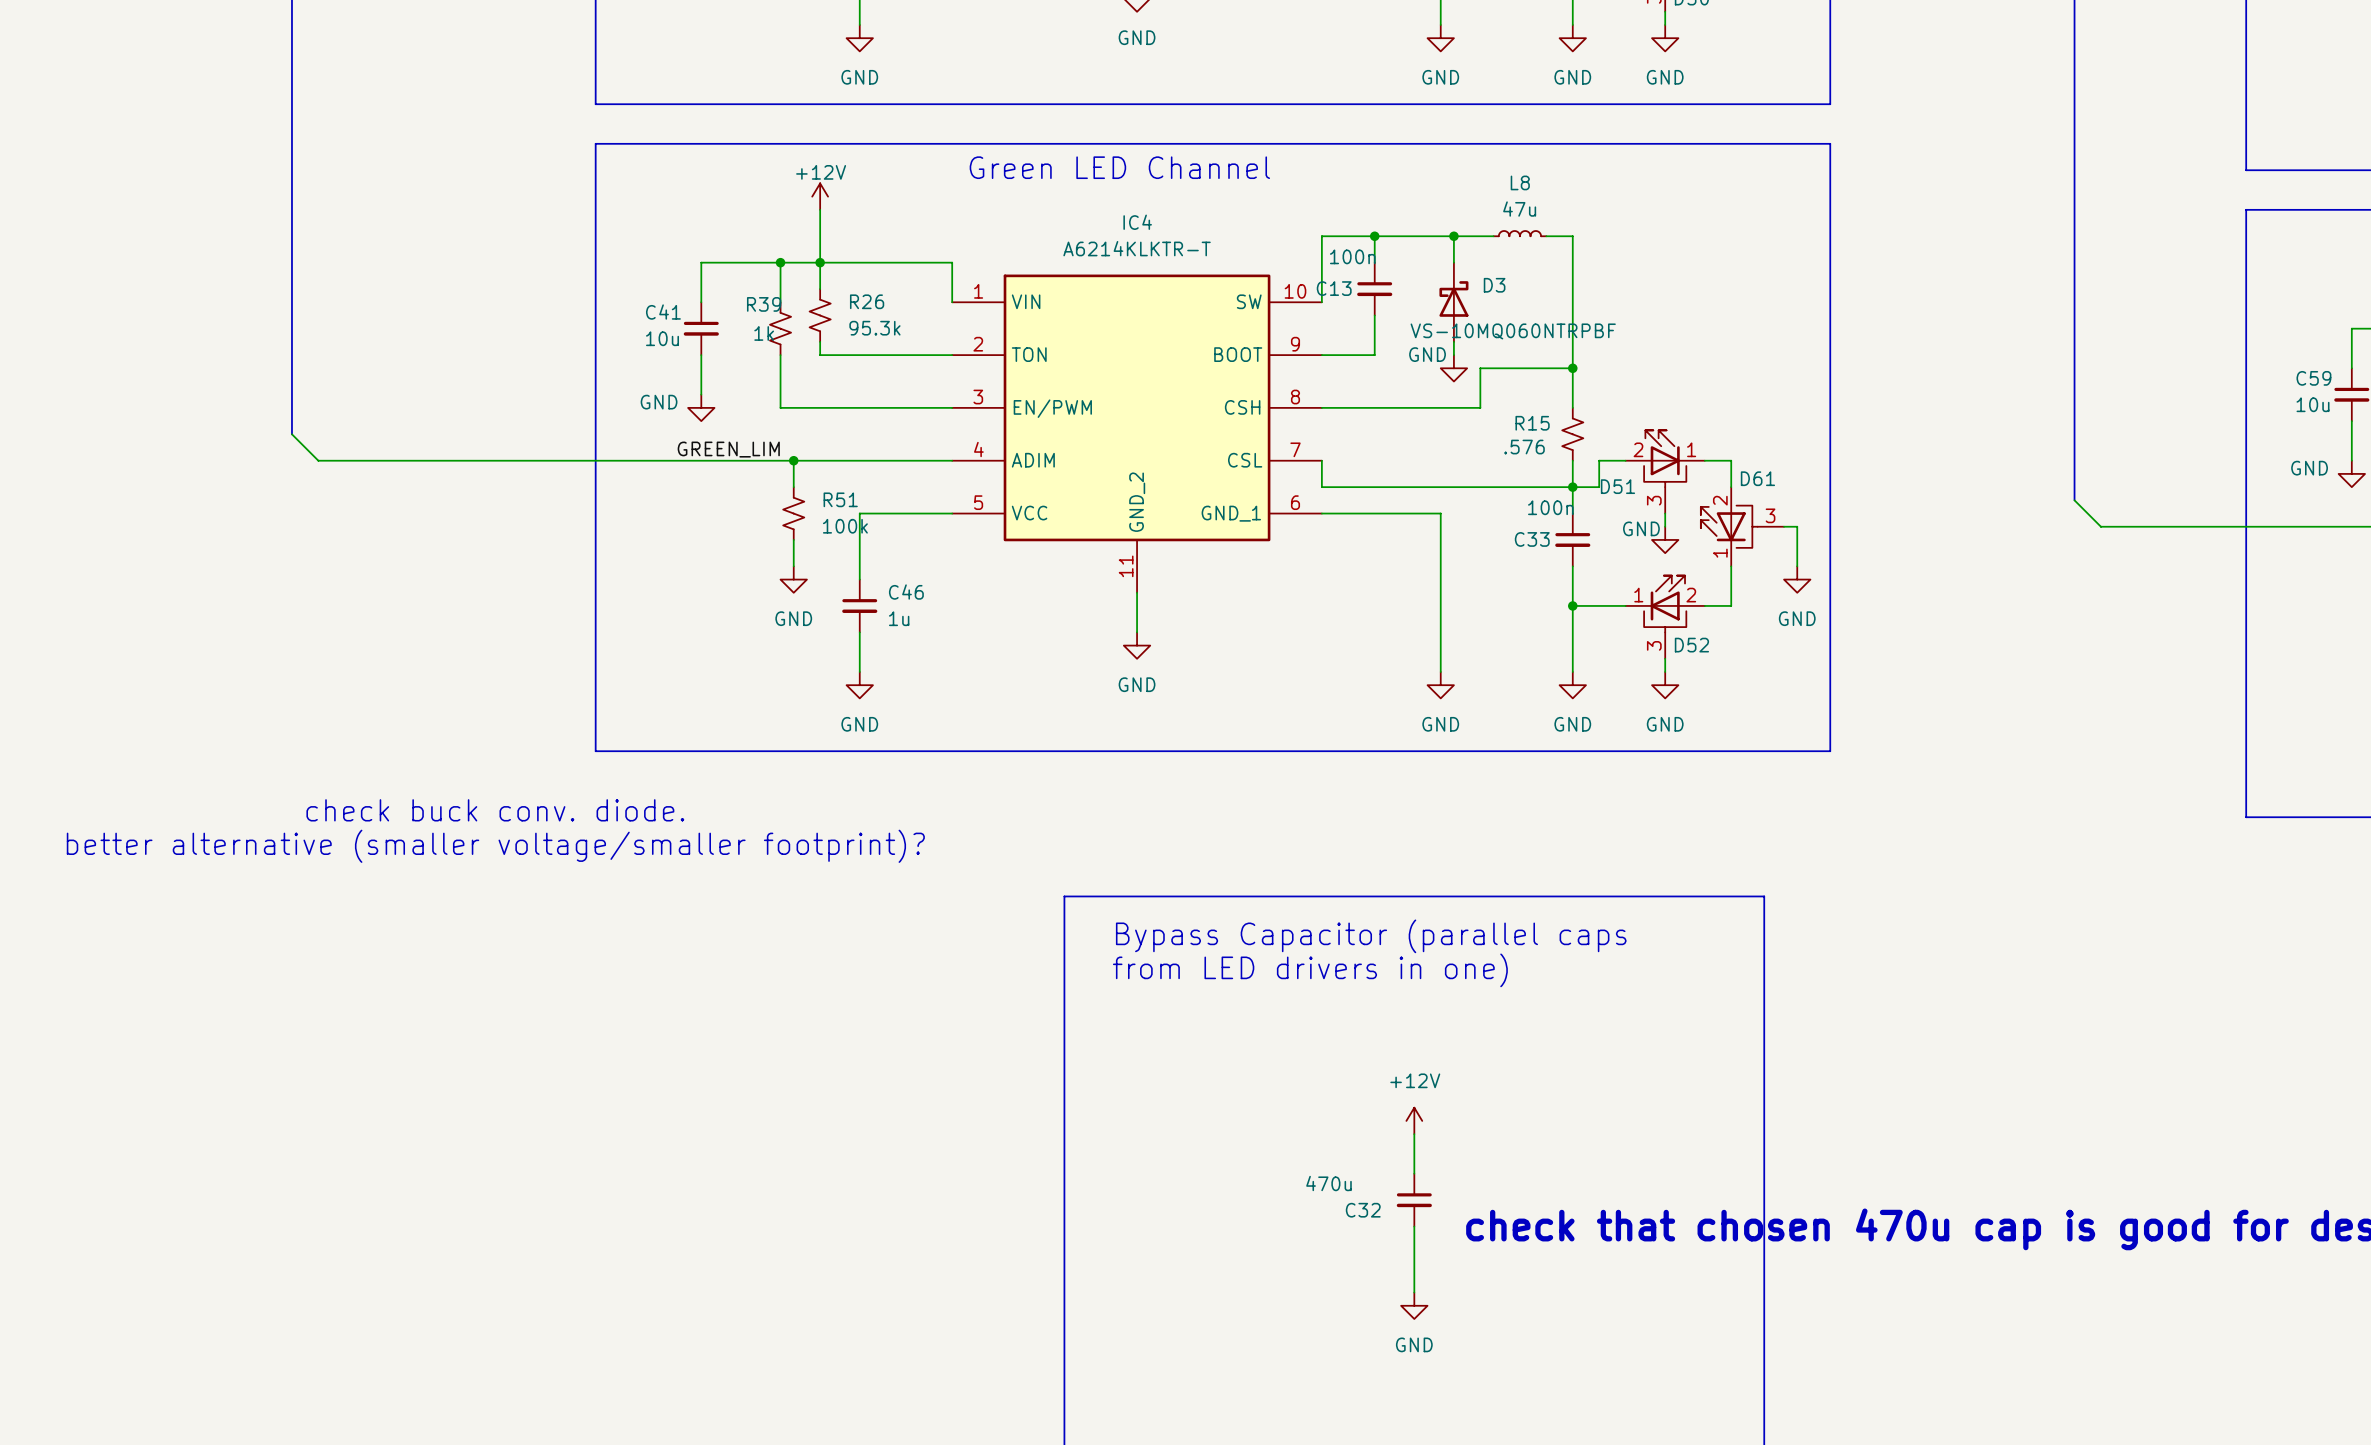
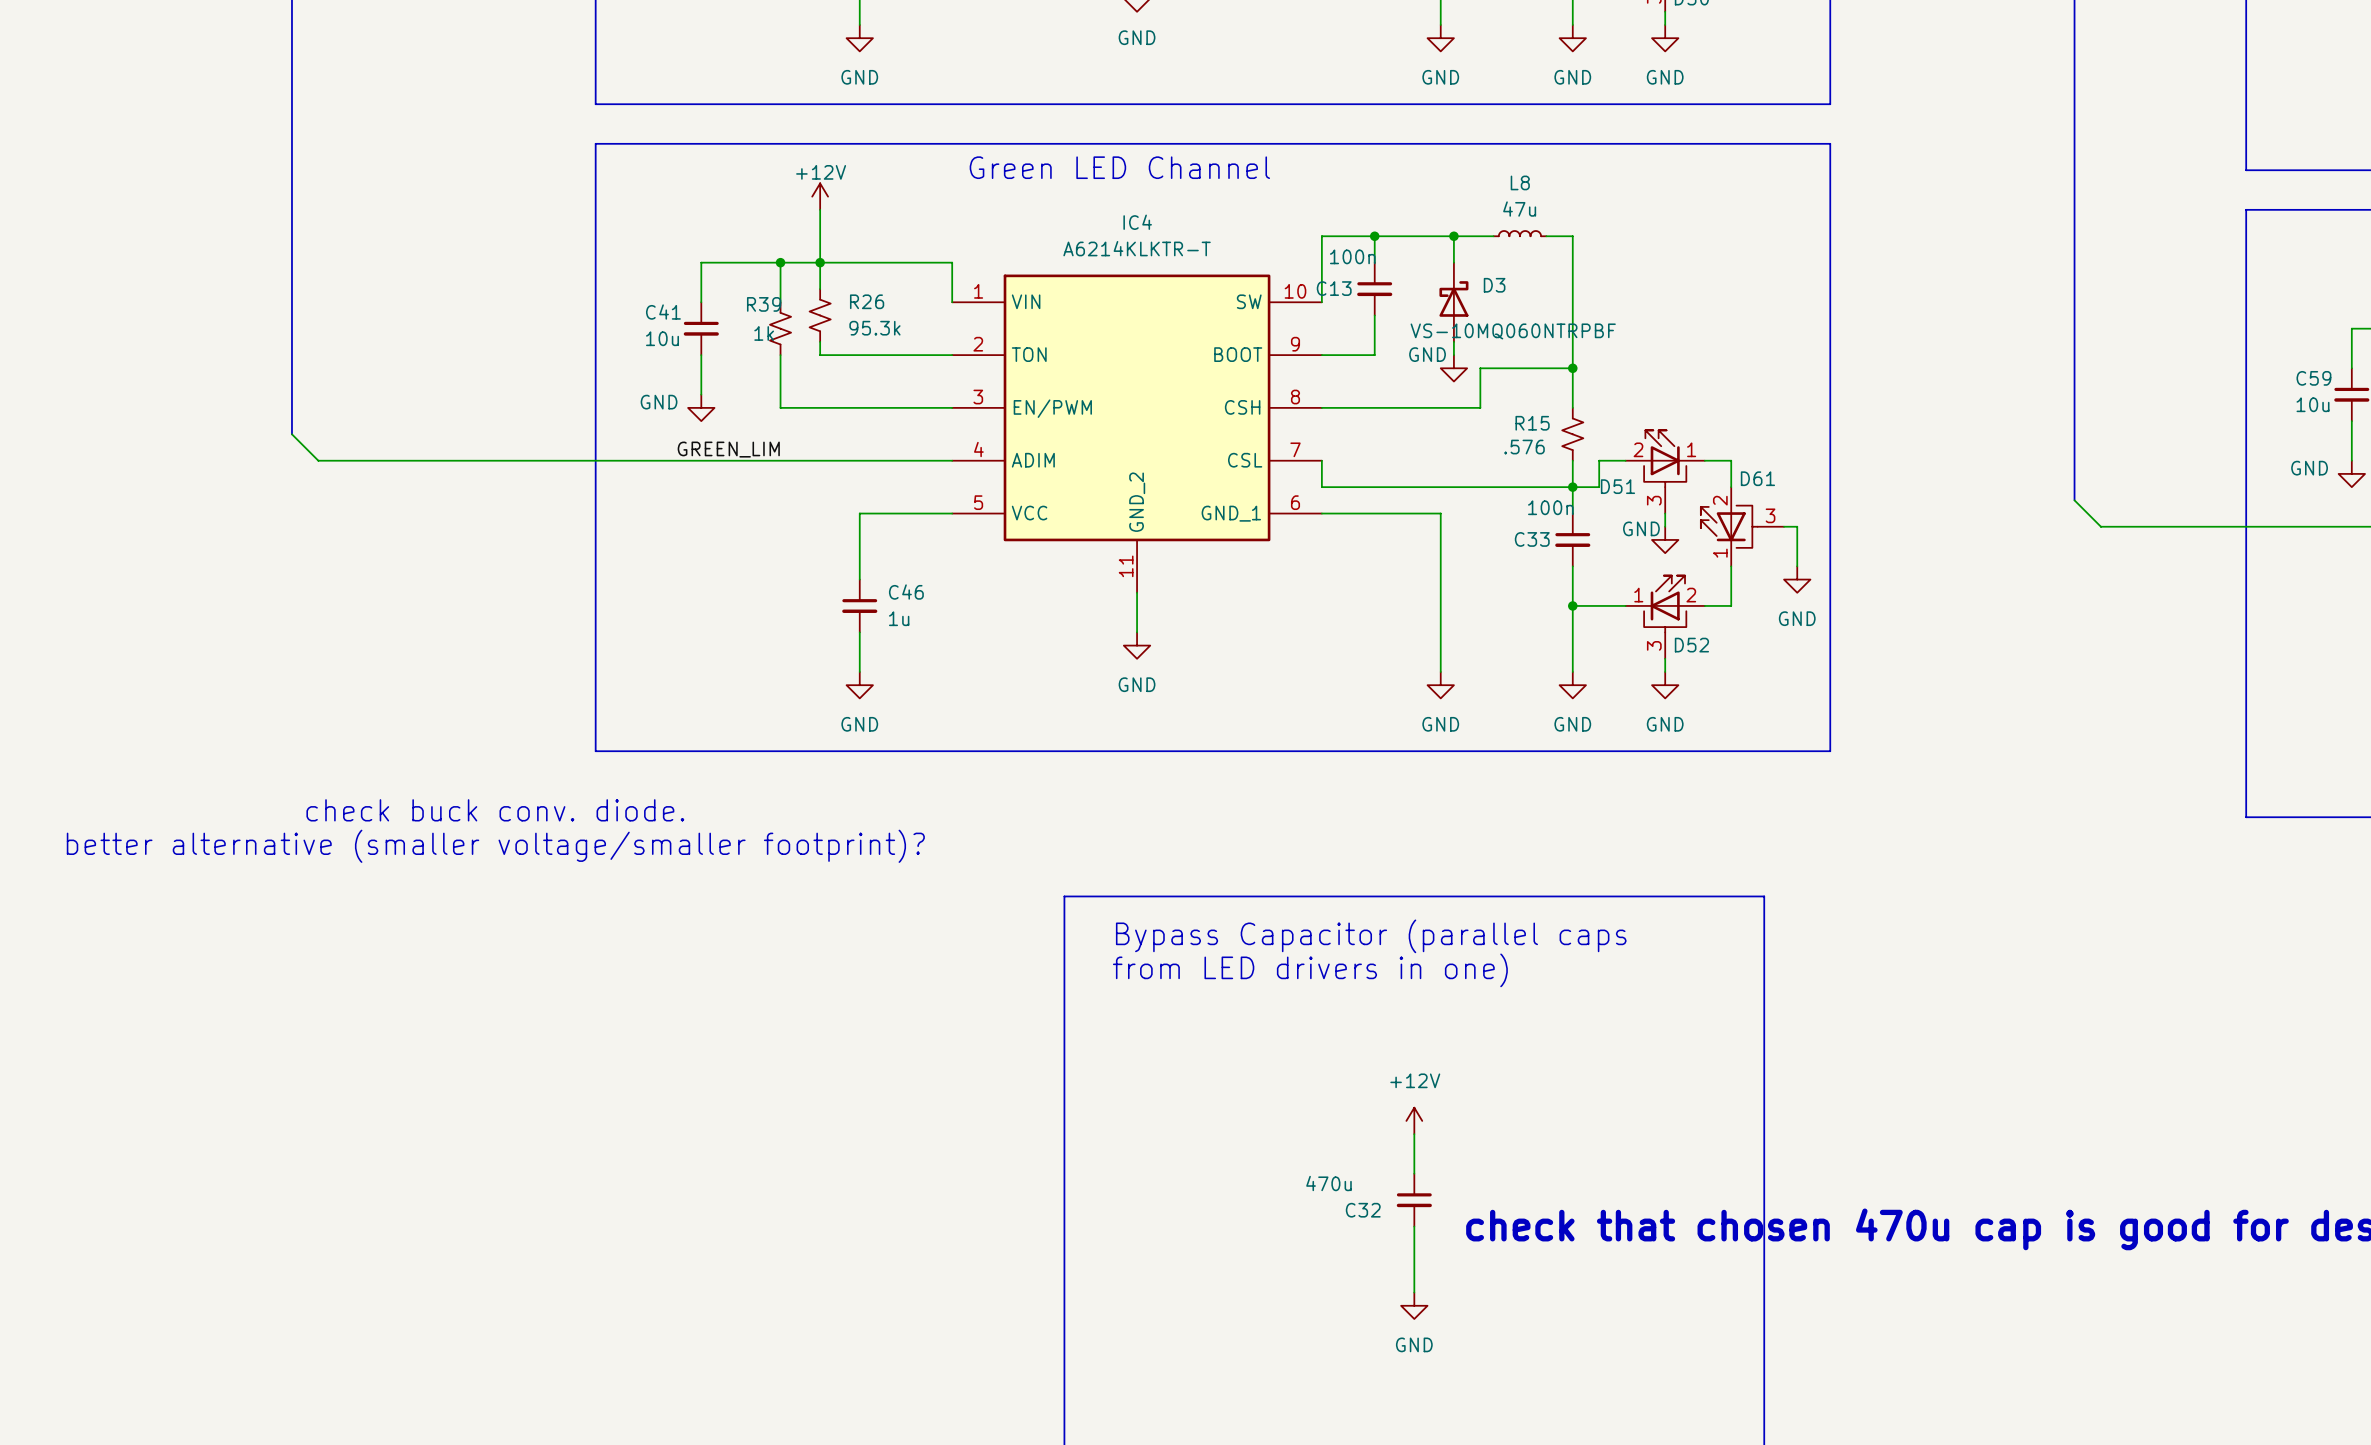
wire: (793, 460) (793, 487) -> none
junction: (793, 460) -> none
R51: 100k (793, 513) -> none
wire: (793, 539) (793, 566) -> none
power symbol: GND (793, 579) -> none

